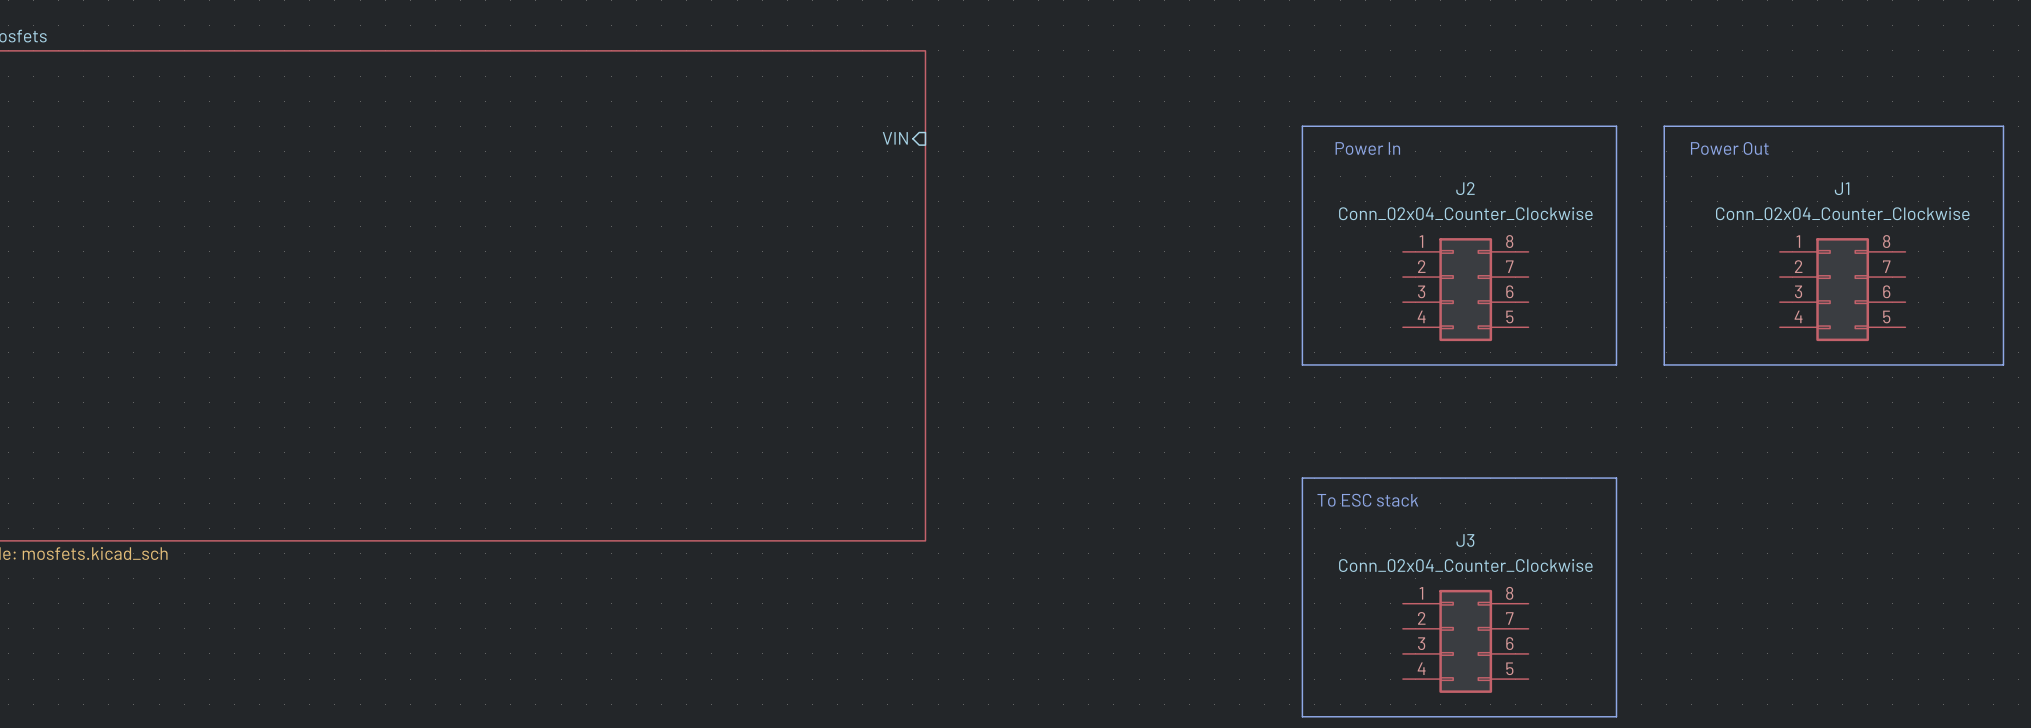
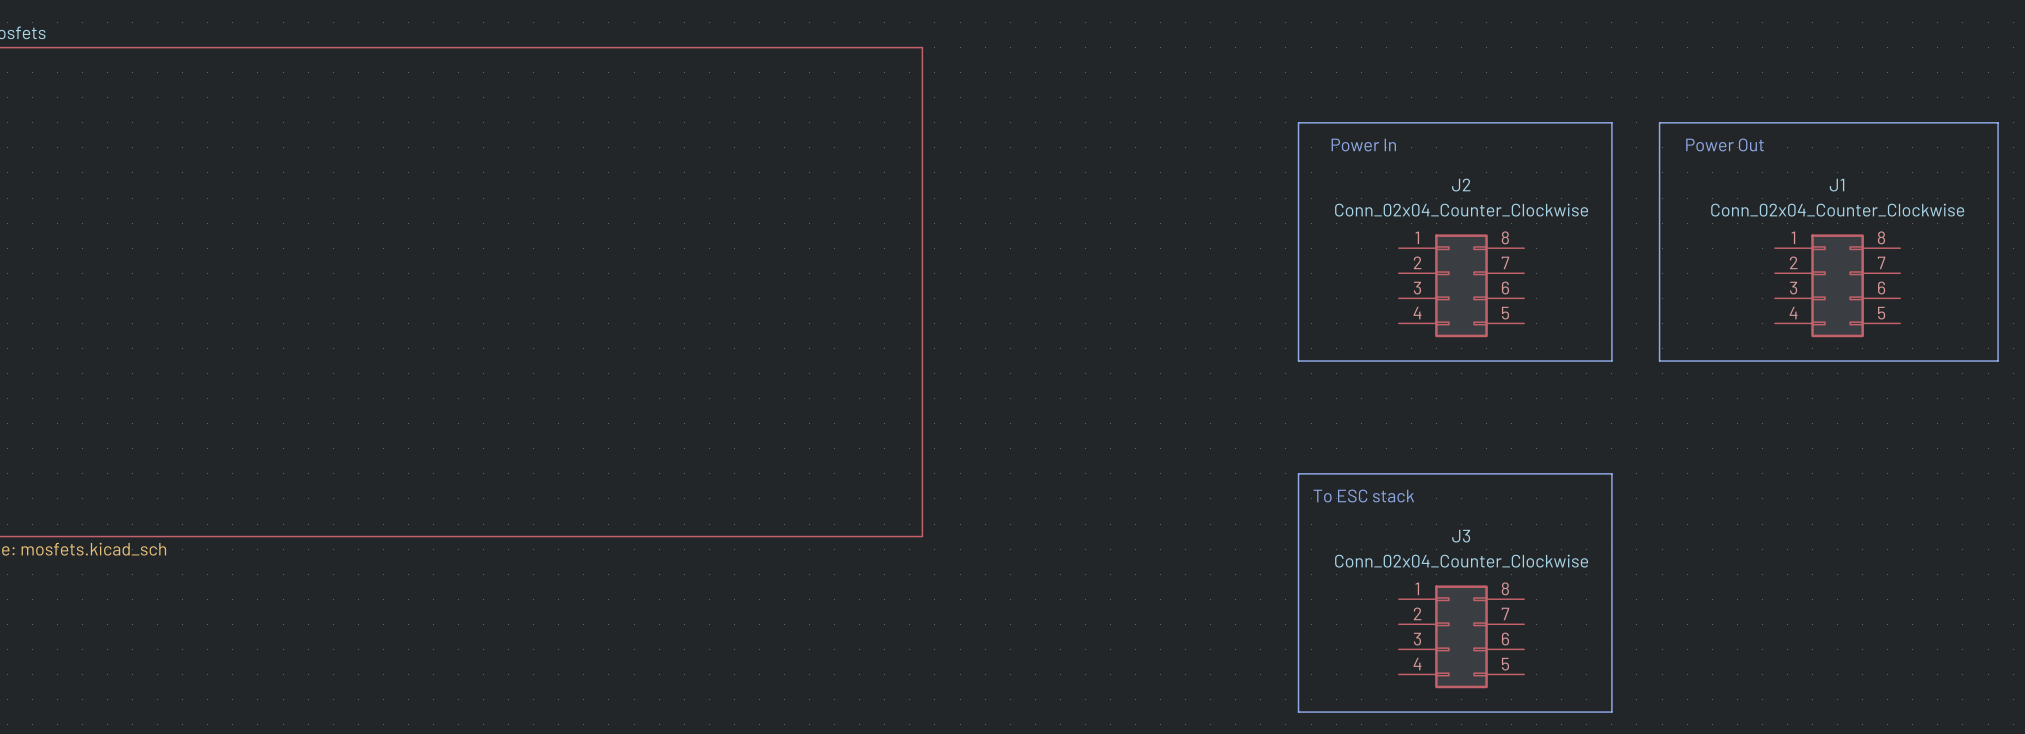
sheet pin: VIN (895, 138) -> none

